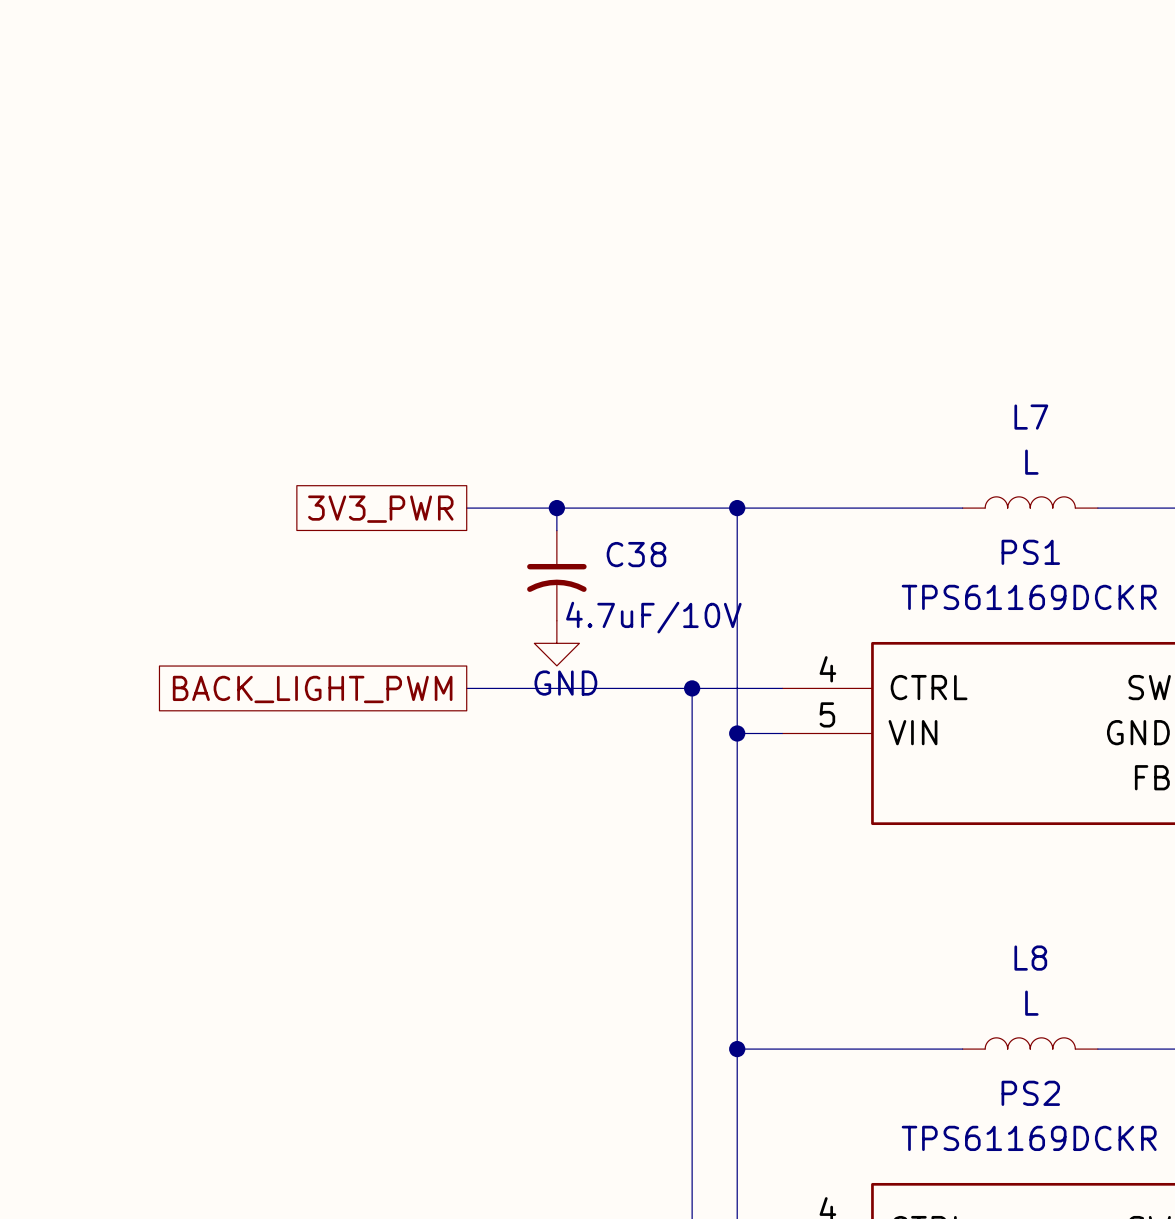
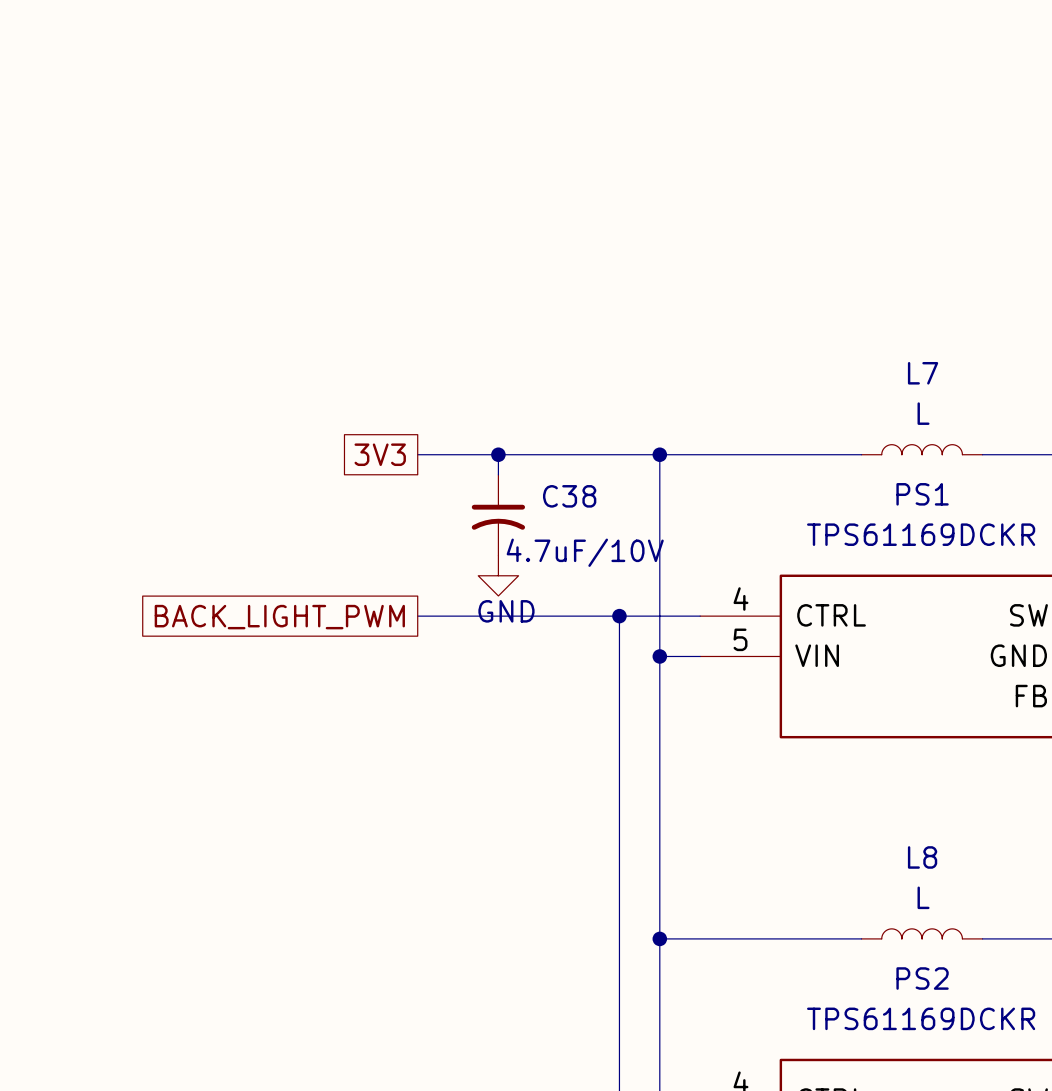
global label: 3V3_PWR (380, 509) -> 3V3 (380, 454)

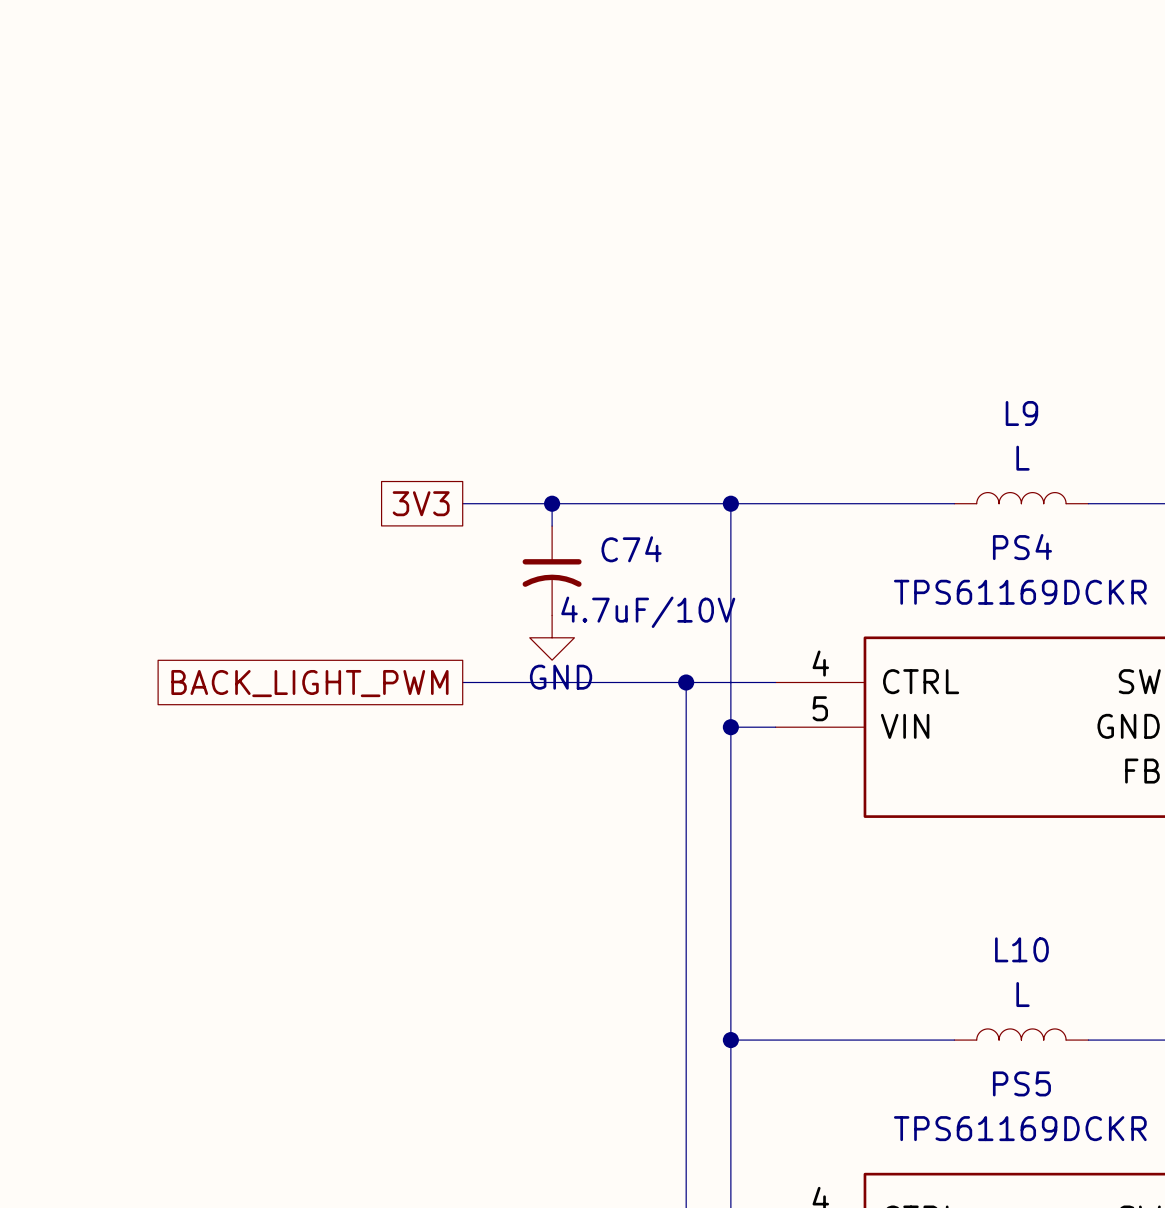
L7 name: L7 (923, 373) -> L9 (1021, 413)
PS1 name: PS1 (922, 494) -> PS4 (1022, 547)
C38 name: C38 (569, 496) -> C74 (631, 549)
L8 name: L8 (922, 857) -> L10 (1021, 949)
PS2 name: PS2 (922, 978) -> PS5 (1021, 1083)

